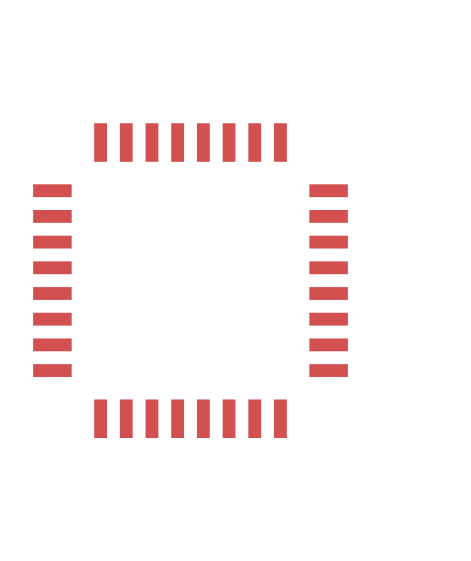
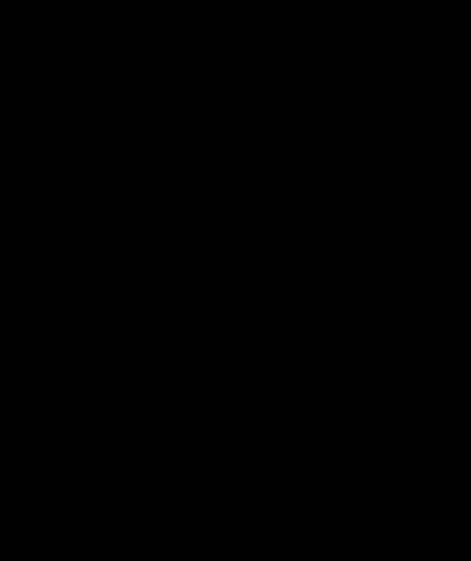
part: (190, 280) -> none

